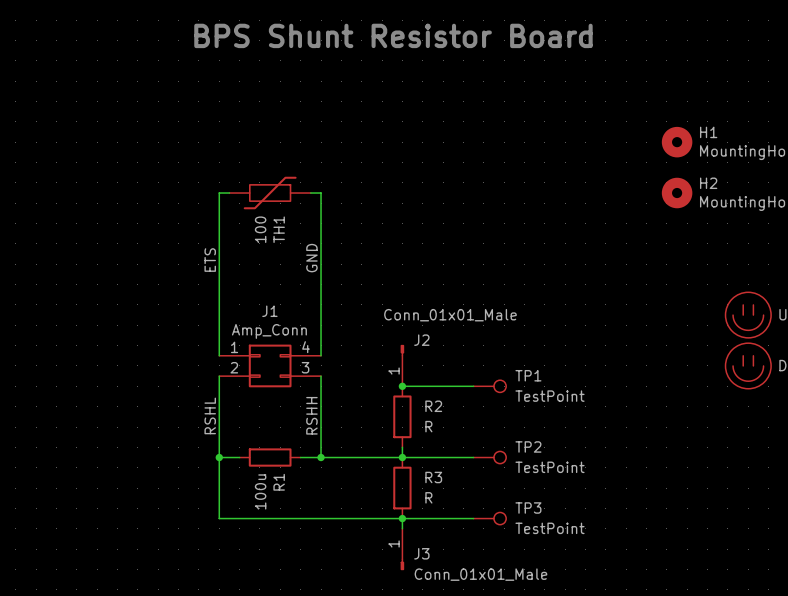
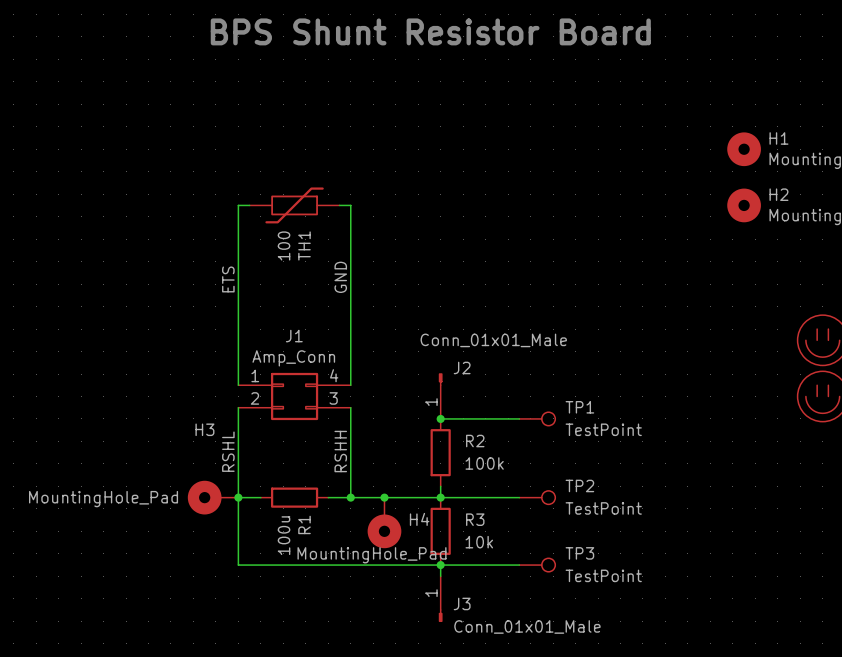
R2 value: R (428, 426) -> 100k (484, 463)
H3: none -> MountingHole_Pad (213, 497)
junction: none -> (384, 497)
H4: none -> MountingHole_Pad (384, 522)
R3 value: R (428, 497) -> 10k (479, 542)

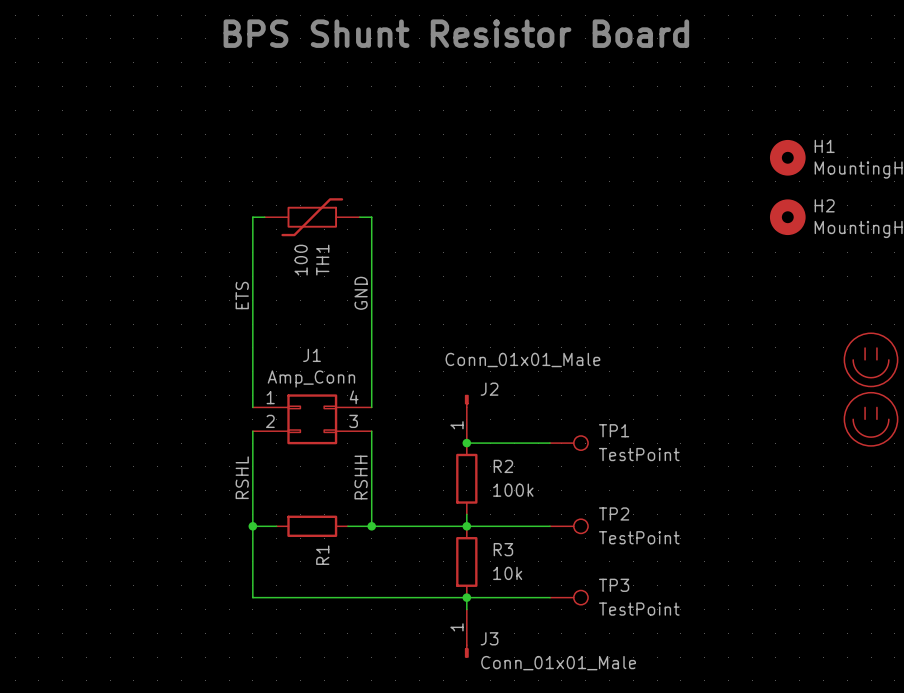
H3: MountingHole_Pad (213, 497) -> none
junction: (384, 497) -> none
H4: MountingHole_Pad (384, 522) -> none
R1 value: 100u (284, 535) -> none

